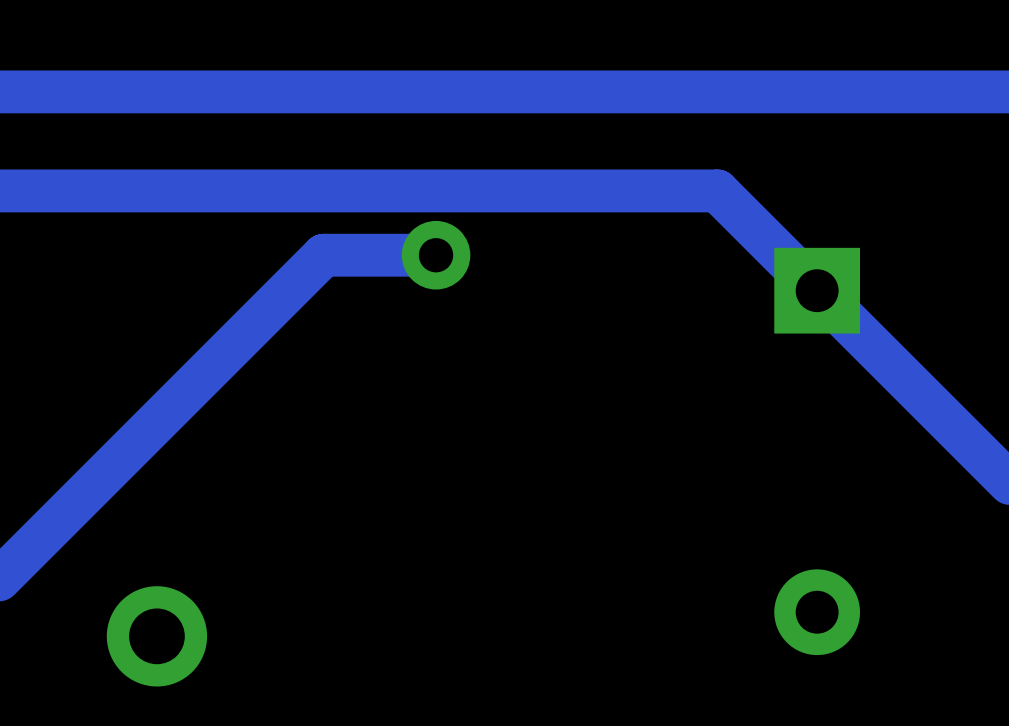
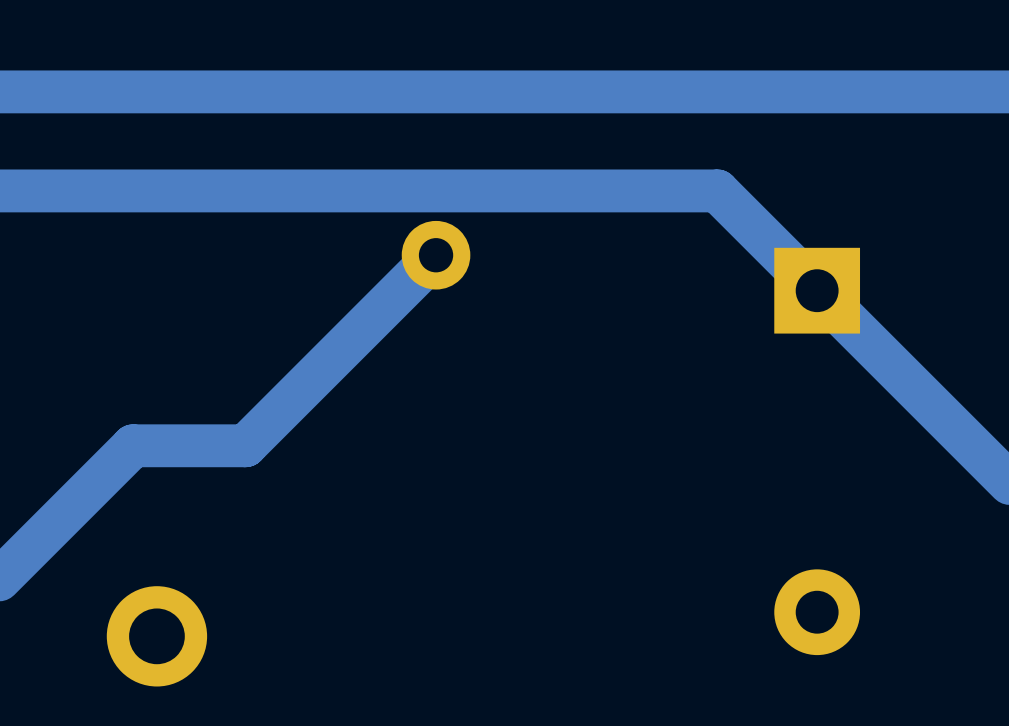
bottom track: (436, 255) (323, 255) (133, 445) -> (436, 255) (245, 445) (133, 445)

